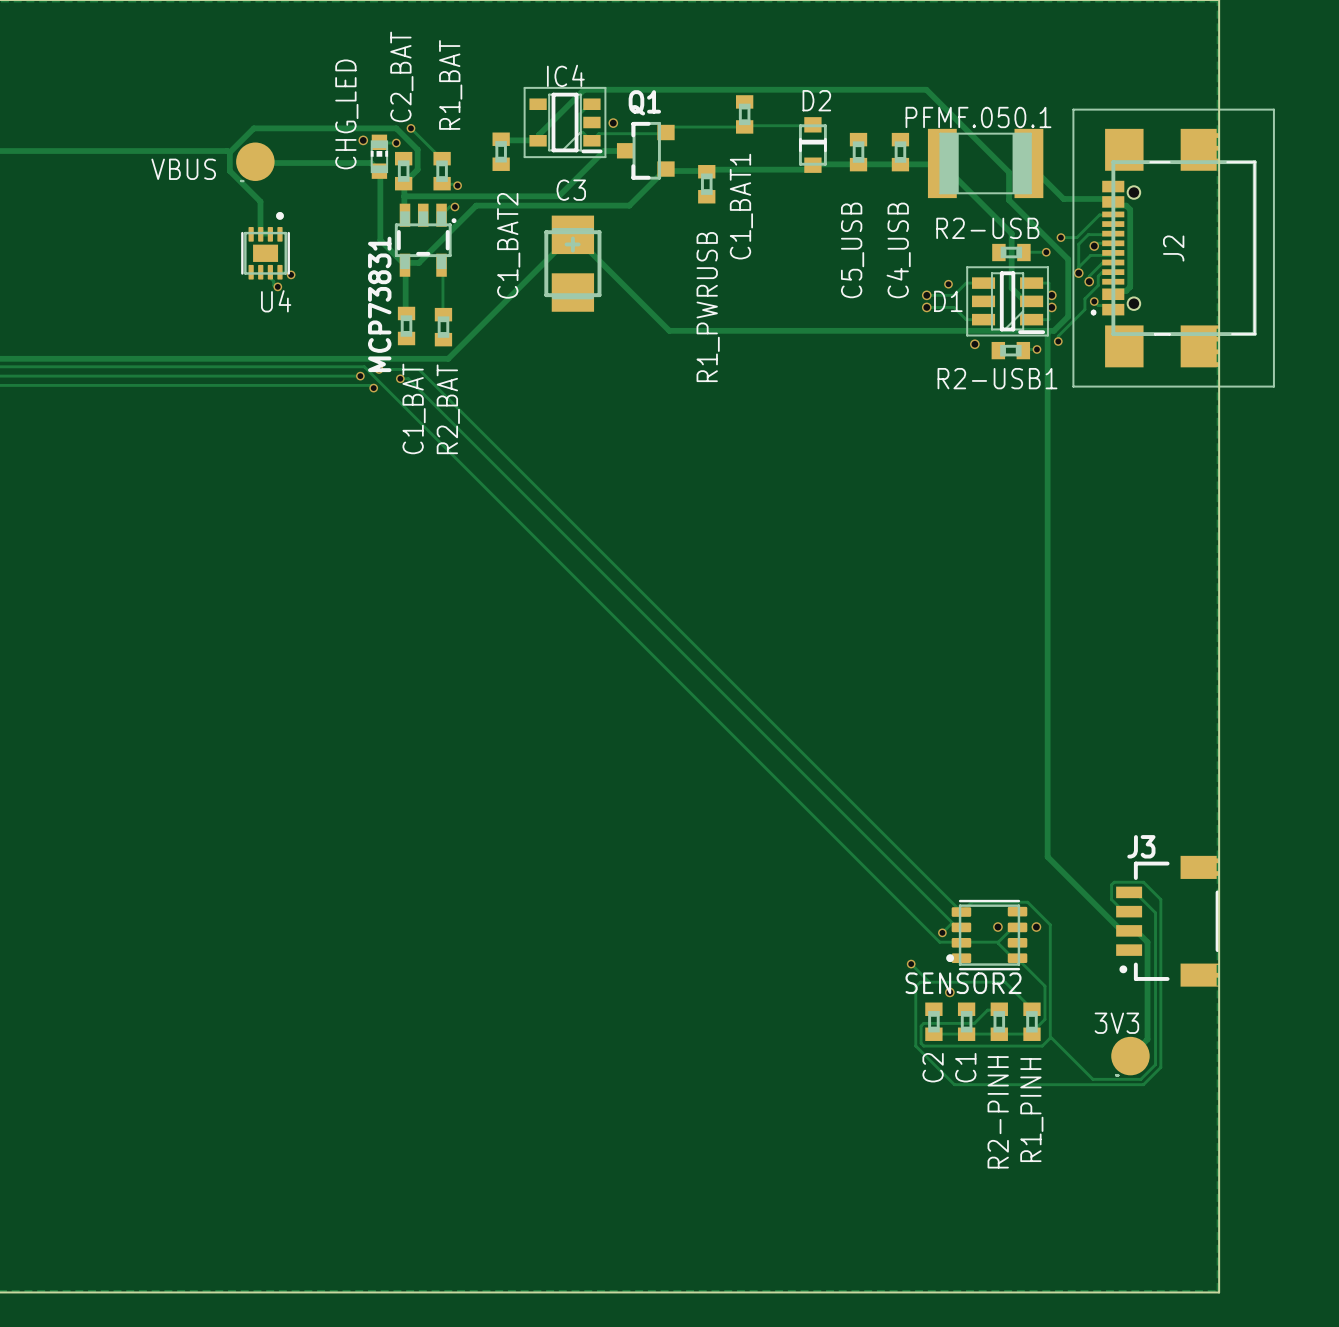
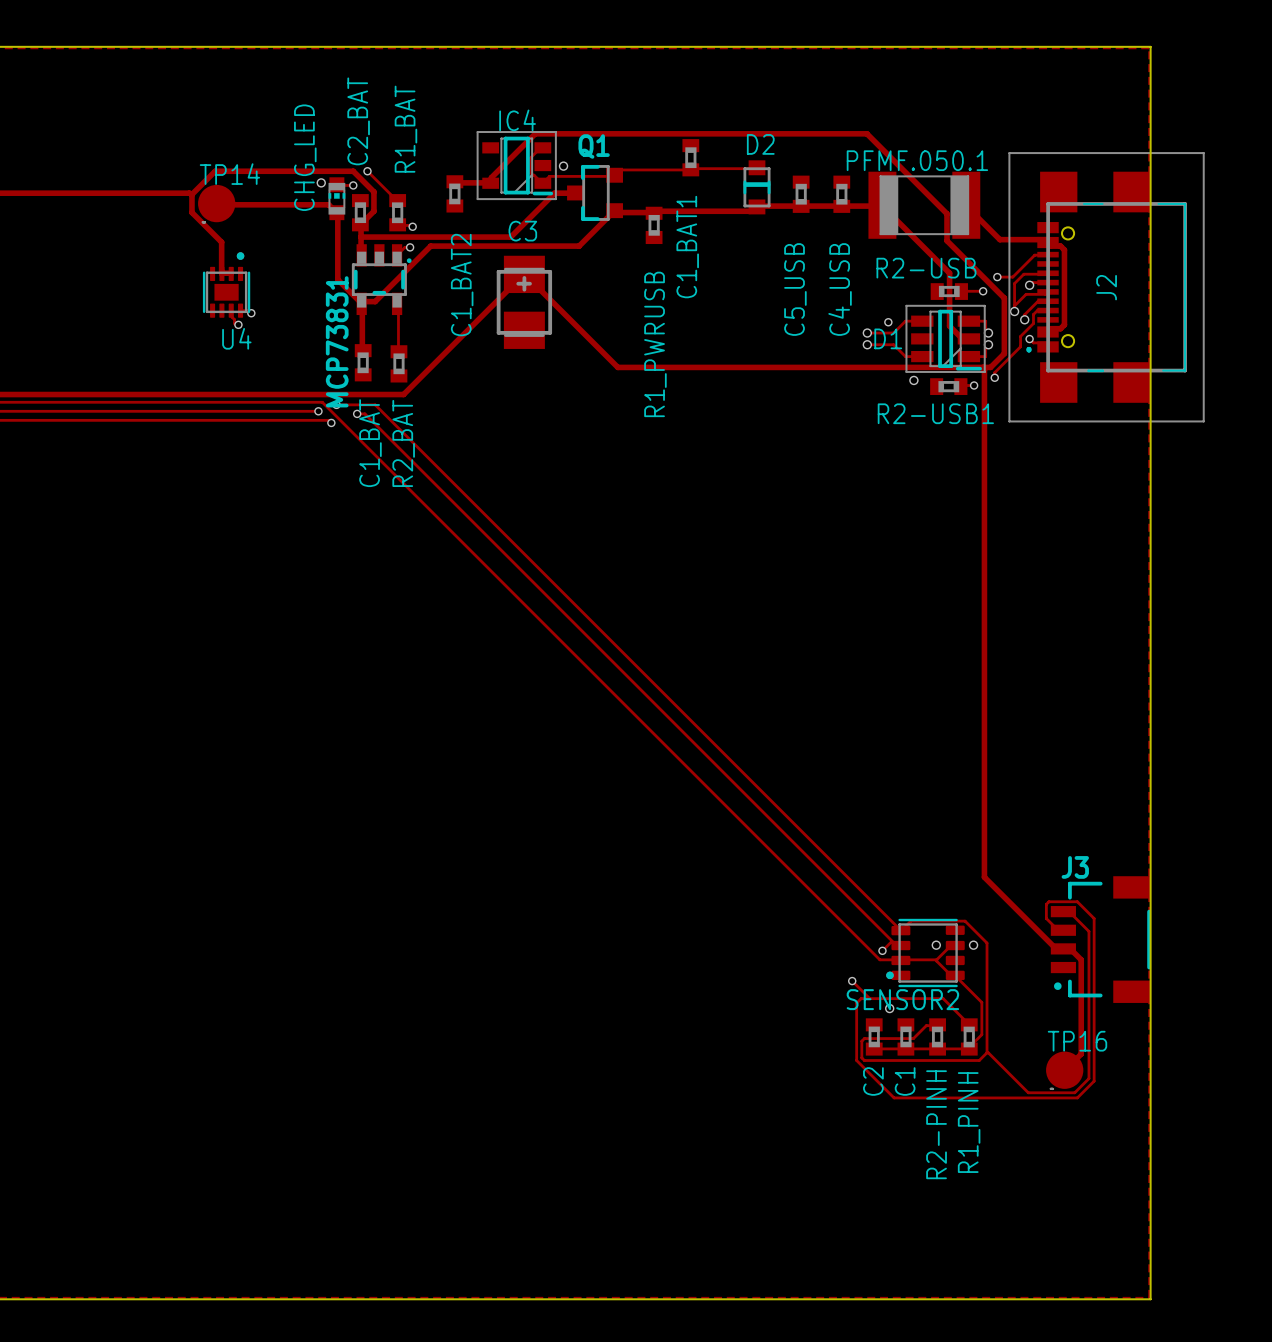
TP14 name: none -> TP14 (229, 174)
TP14 text: VBUS (183, 169) -> none
TP16 text: 3V3 (1116, 1023) -> none
TP16 name: none -> TP16 (1077, 1041)

